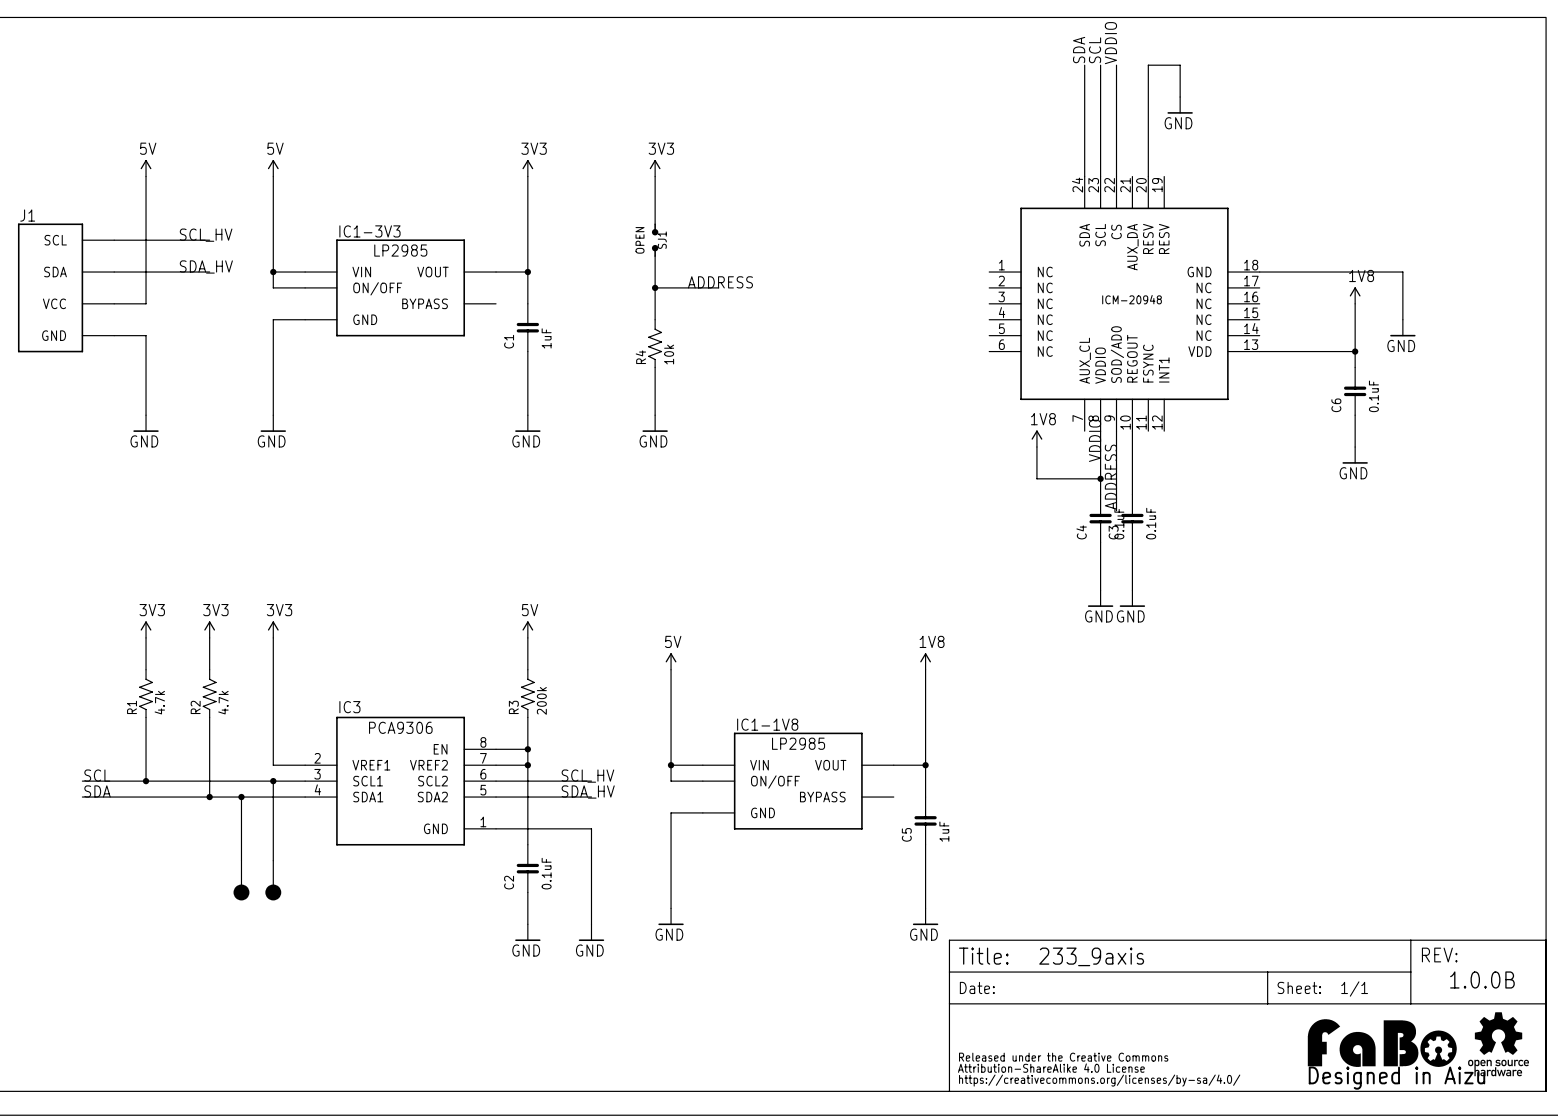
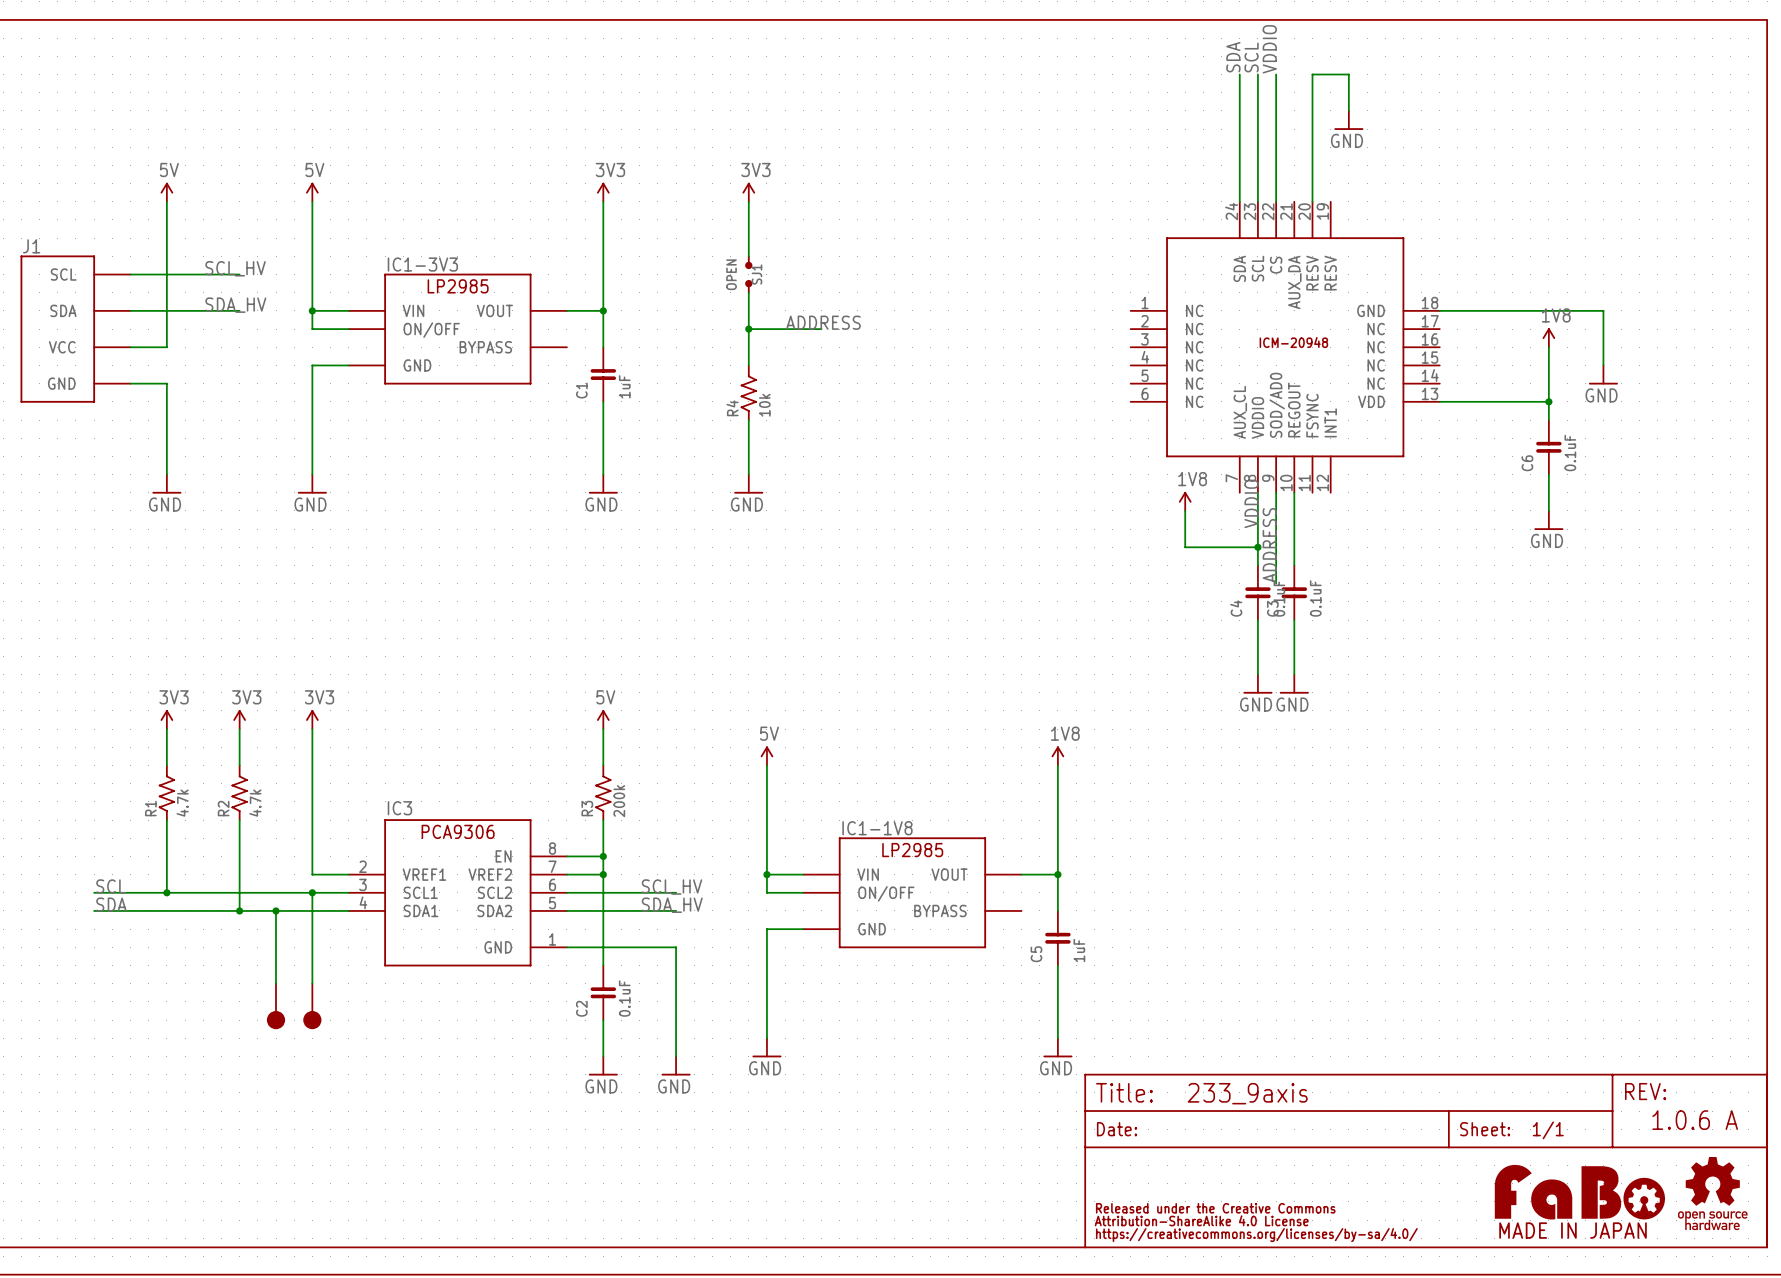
text: 1.0.0B (1482, 979) -> 1.0.6 A (1695, 1120)
part text: none -> MADE IN JAPAN (1573, 1230)
part text: Designed in Aizu (1396, 1078) -> none

